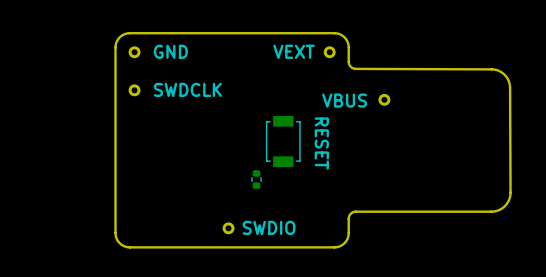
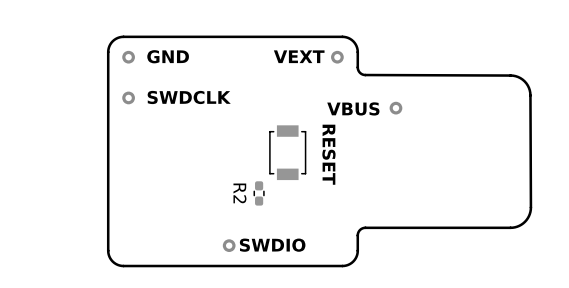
part: (256, 179) -> none
R2: none -> (259, 193)

